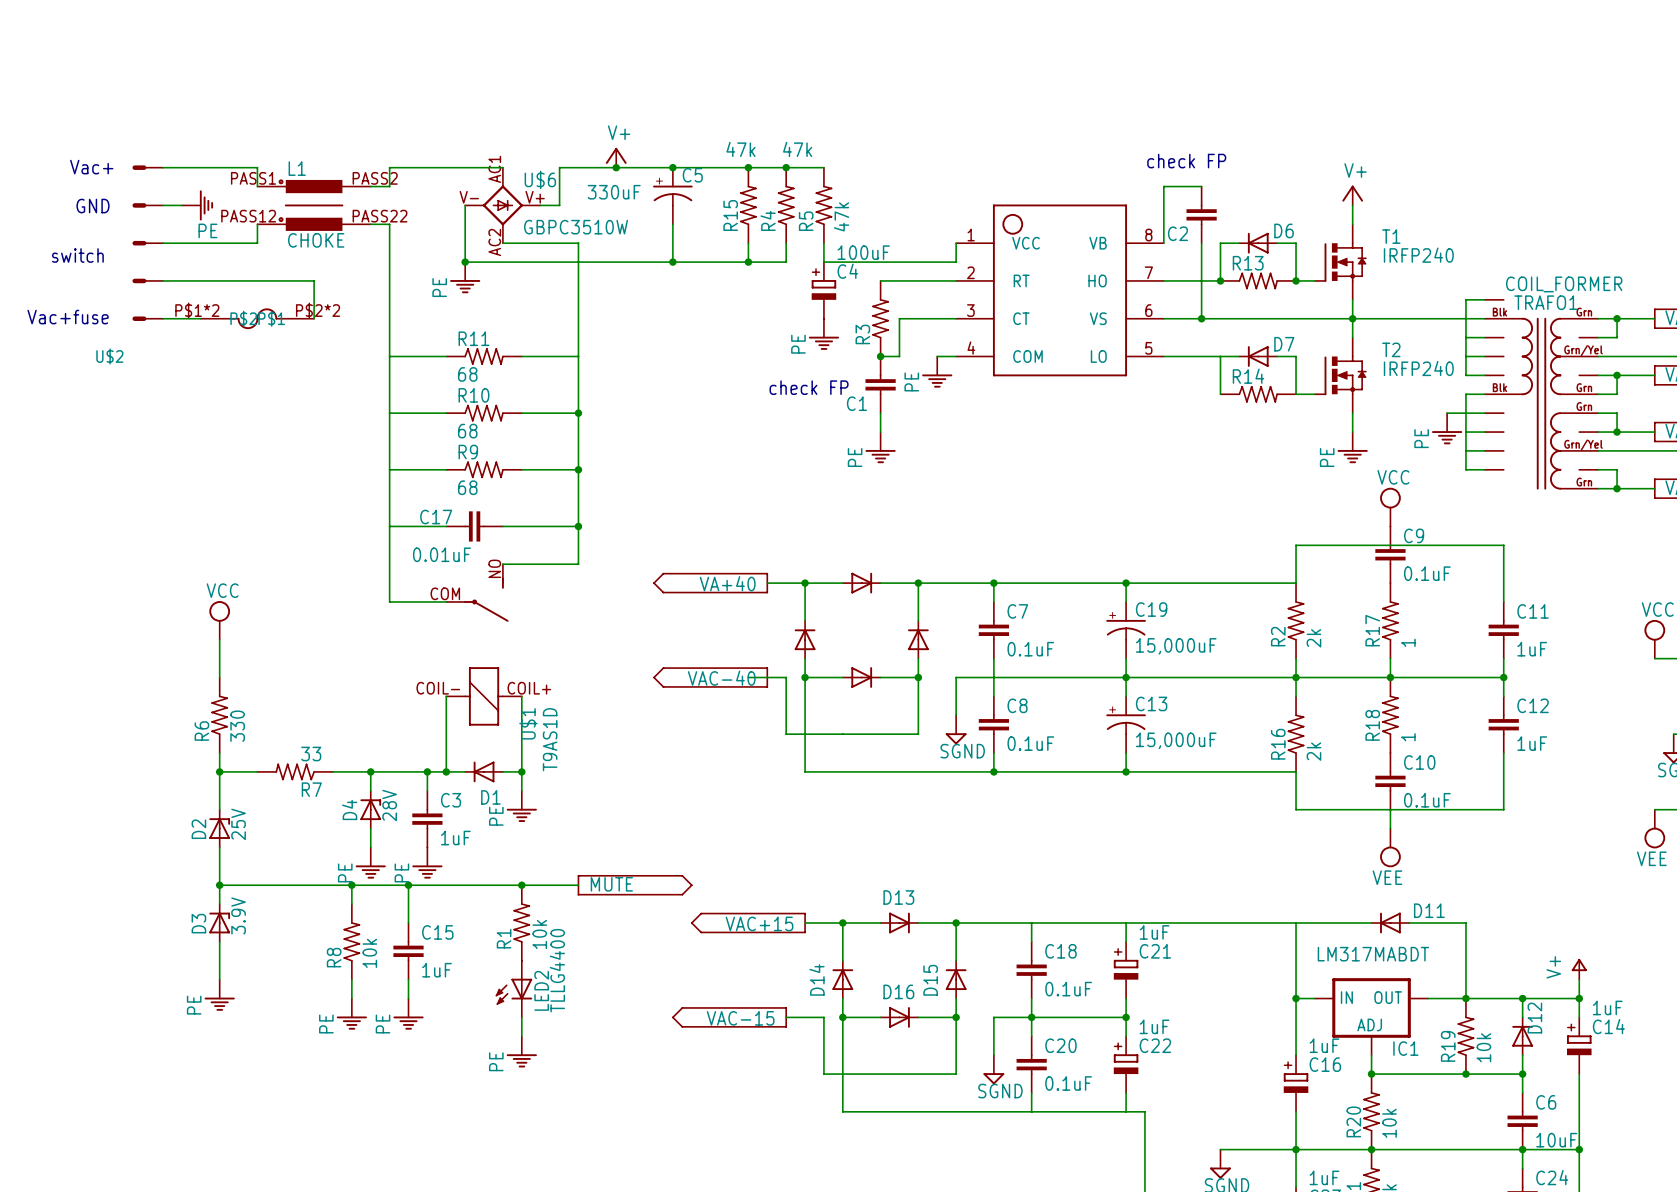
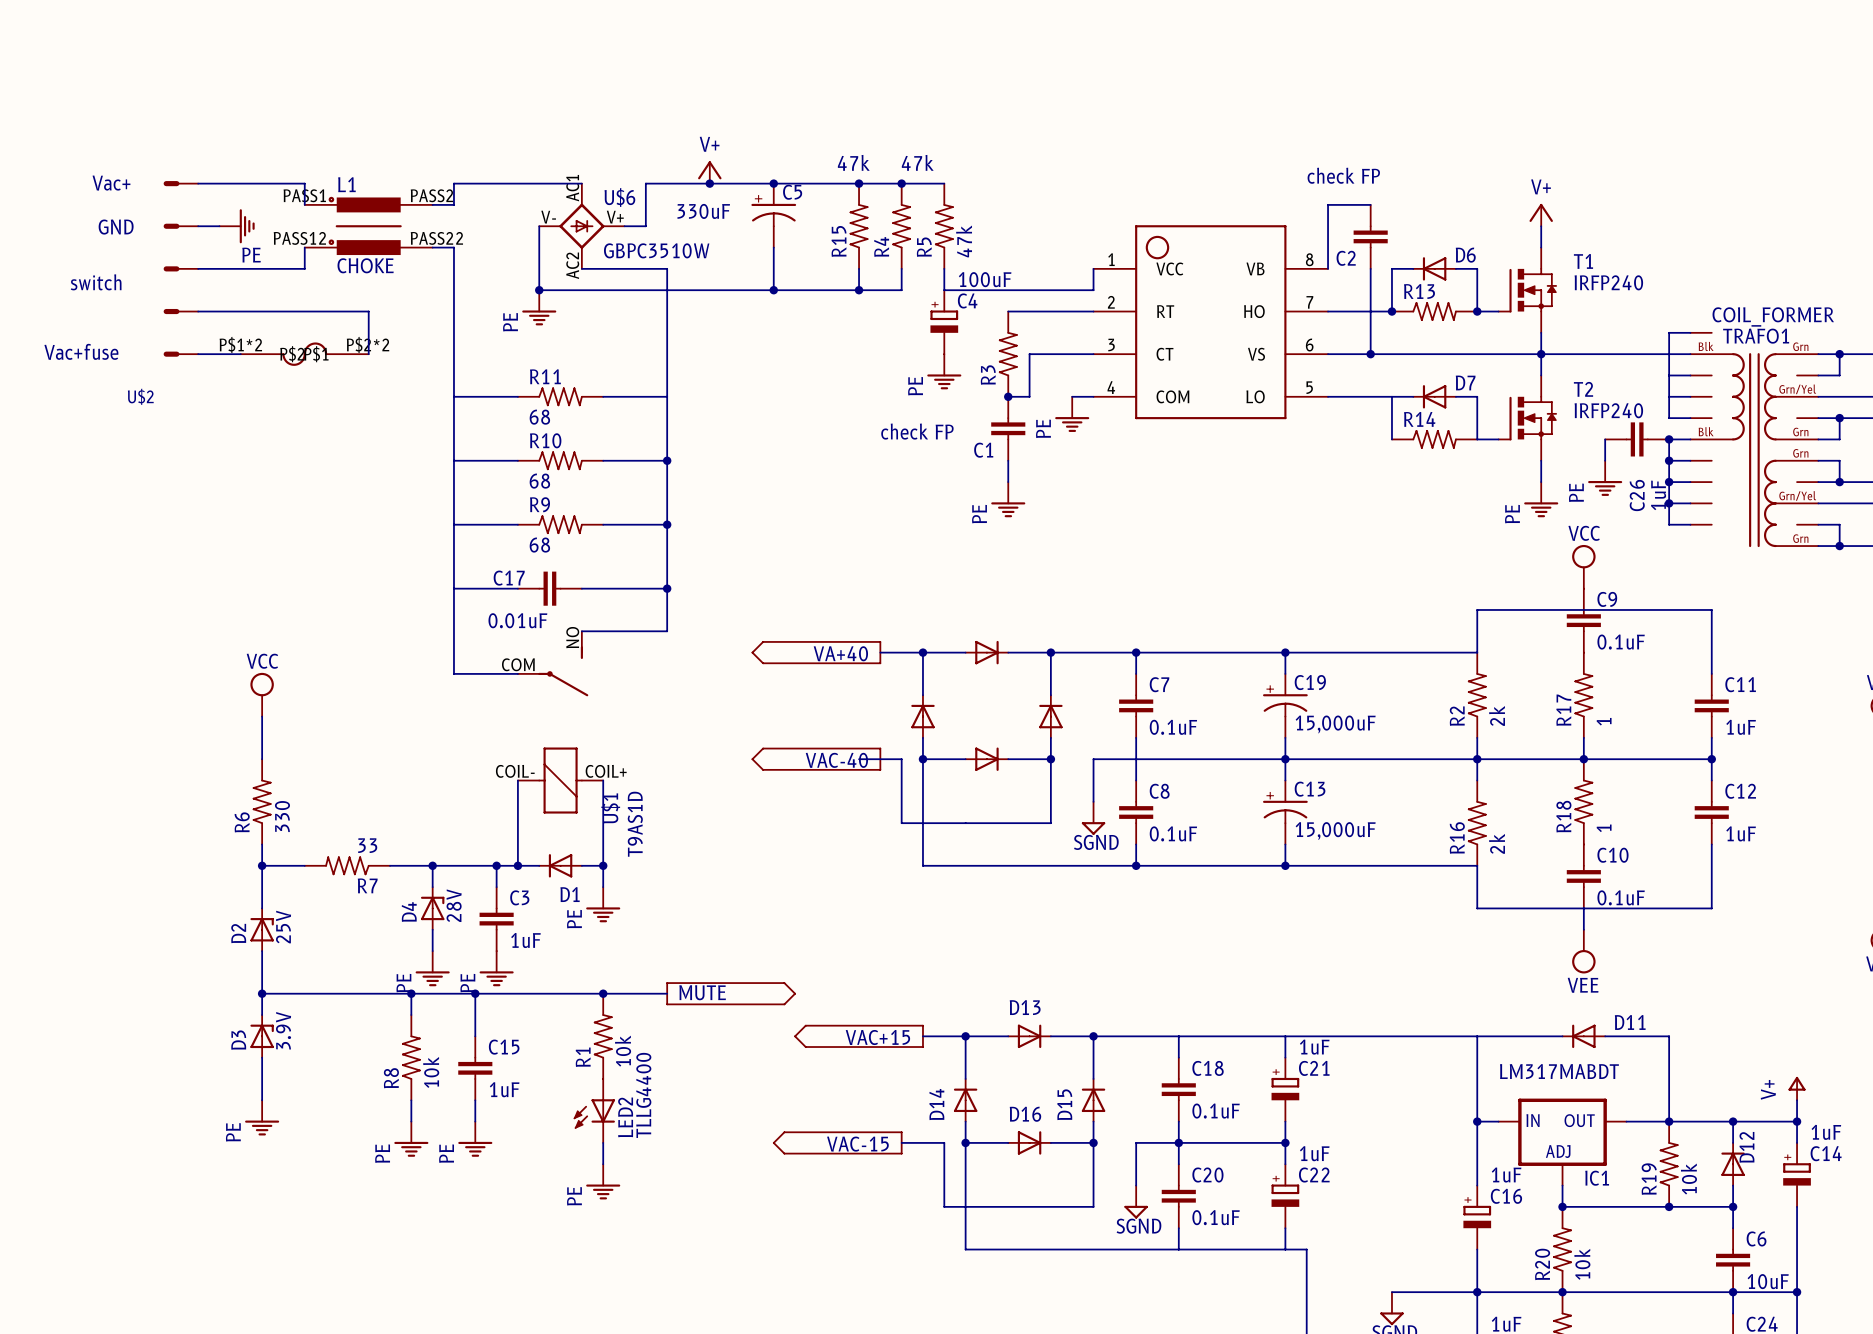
wire: none -> (1605, 439) (1605, 460)
C26: none -> 1uF (1637, 439)
junction: none -> (1669, 439)
wire: (1447, 413) (1465, 413) -> none
junction: none -> (1669, 460)
power symbol position: PE (1447, 428) -> PE (1605, 478)
junction: none -> (1669, 482)
junction: none -> (1669, 503)

